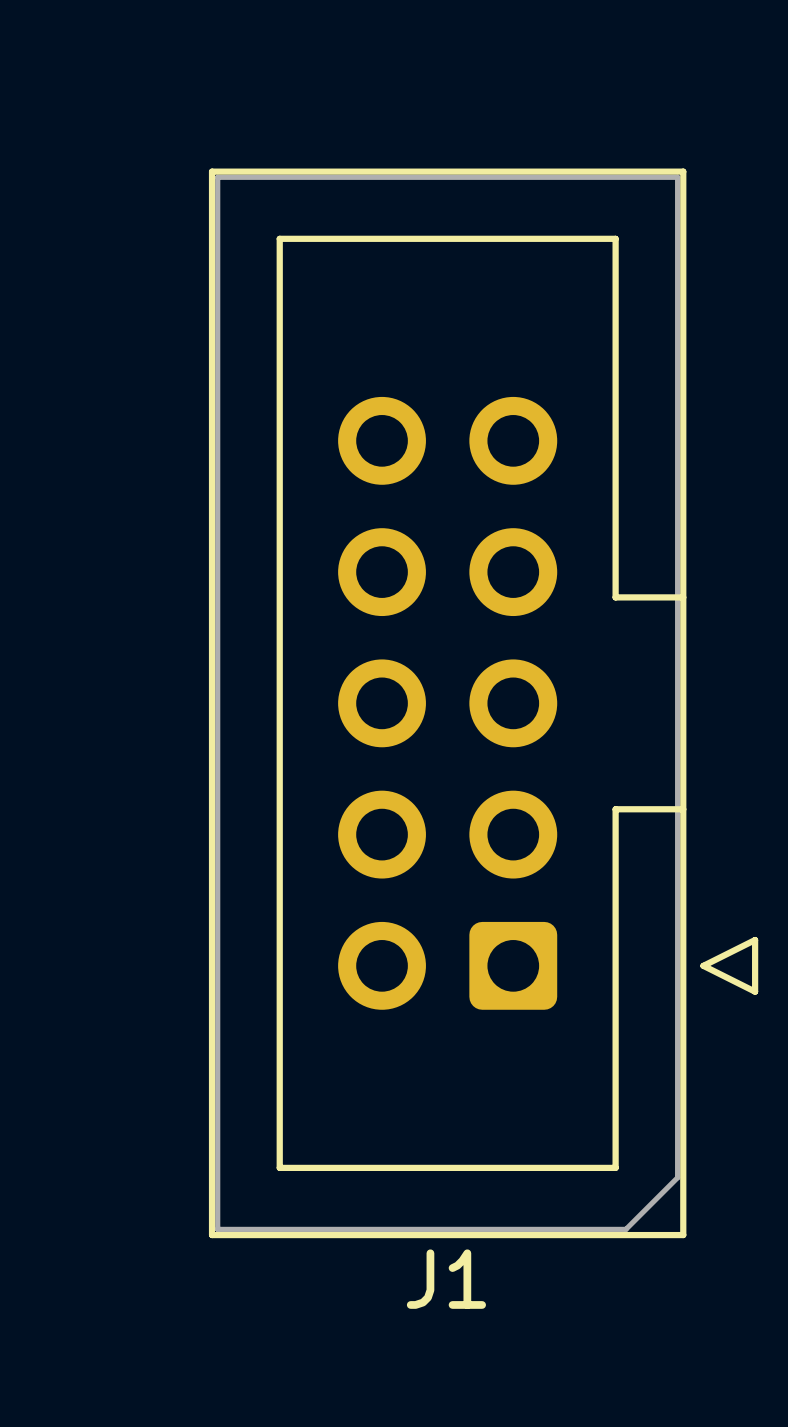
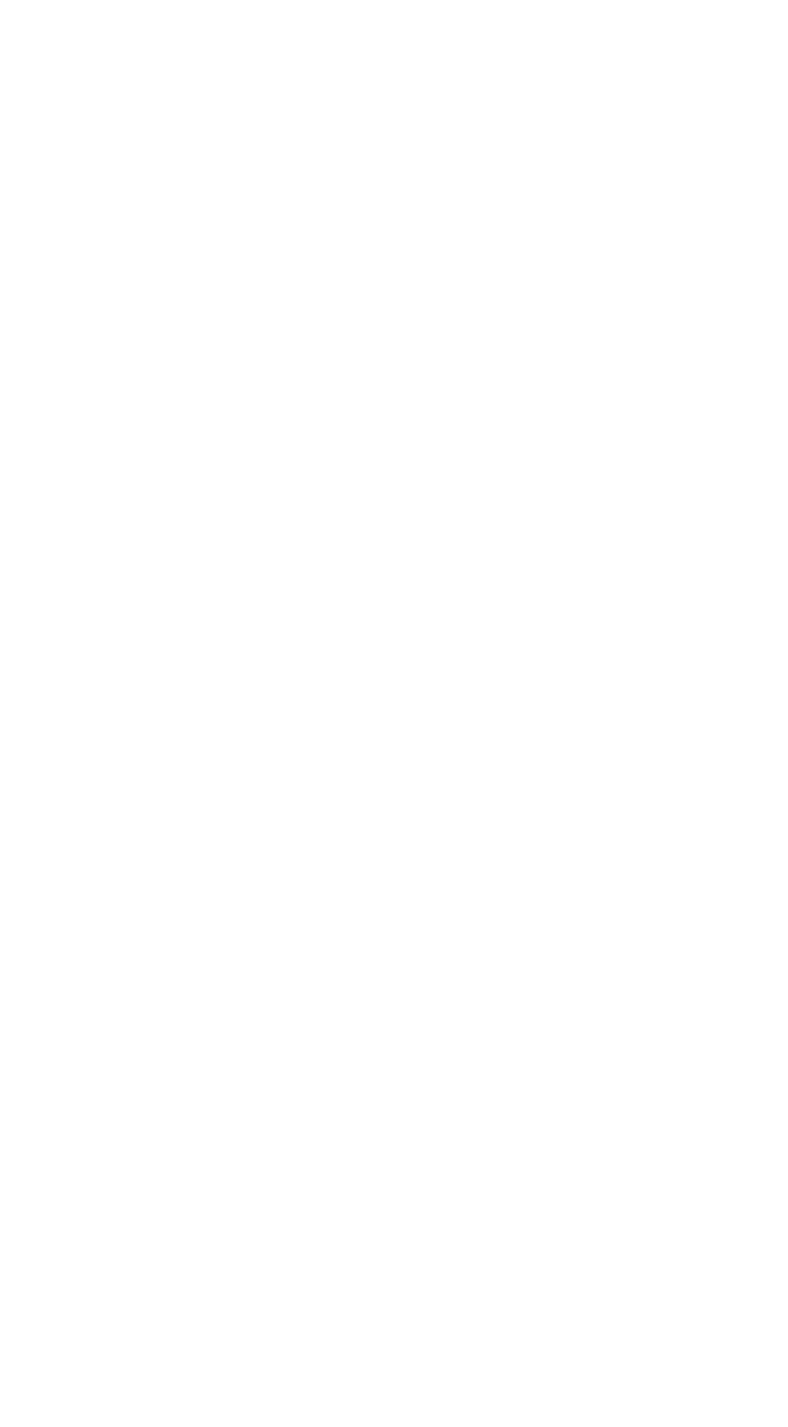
J1: (483, 703) -> none

